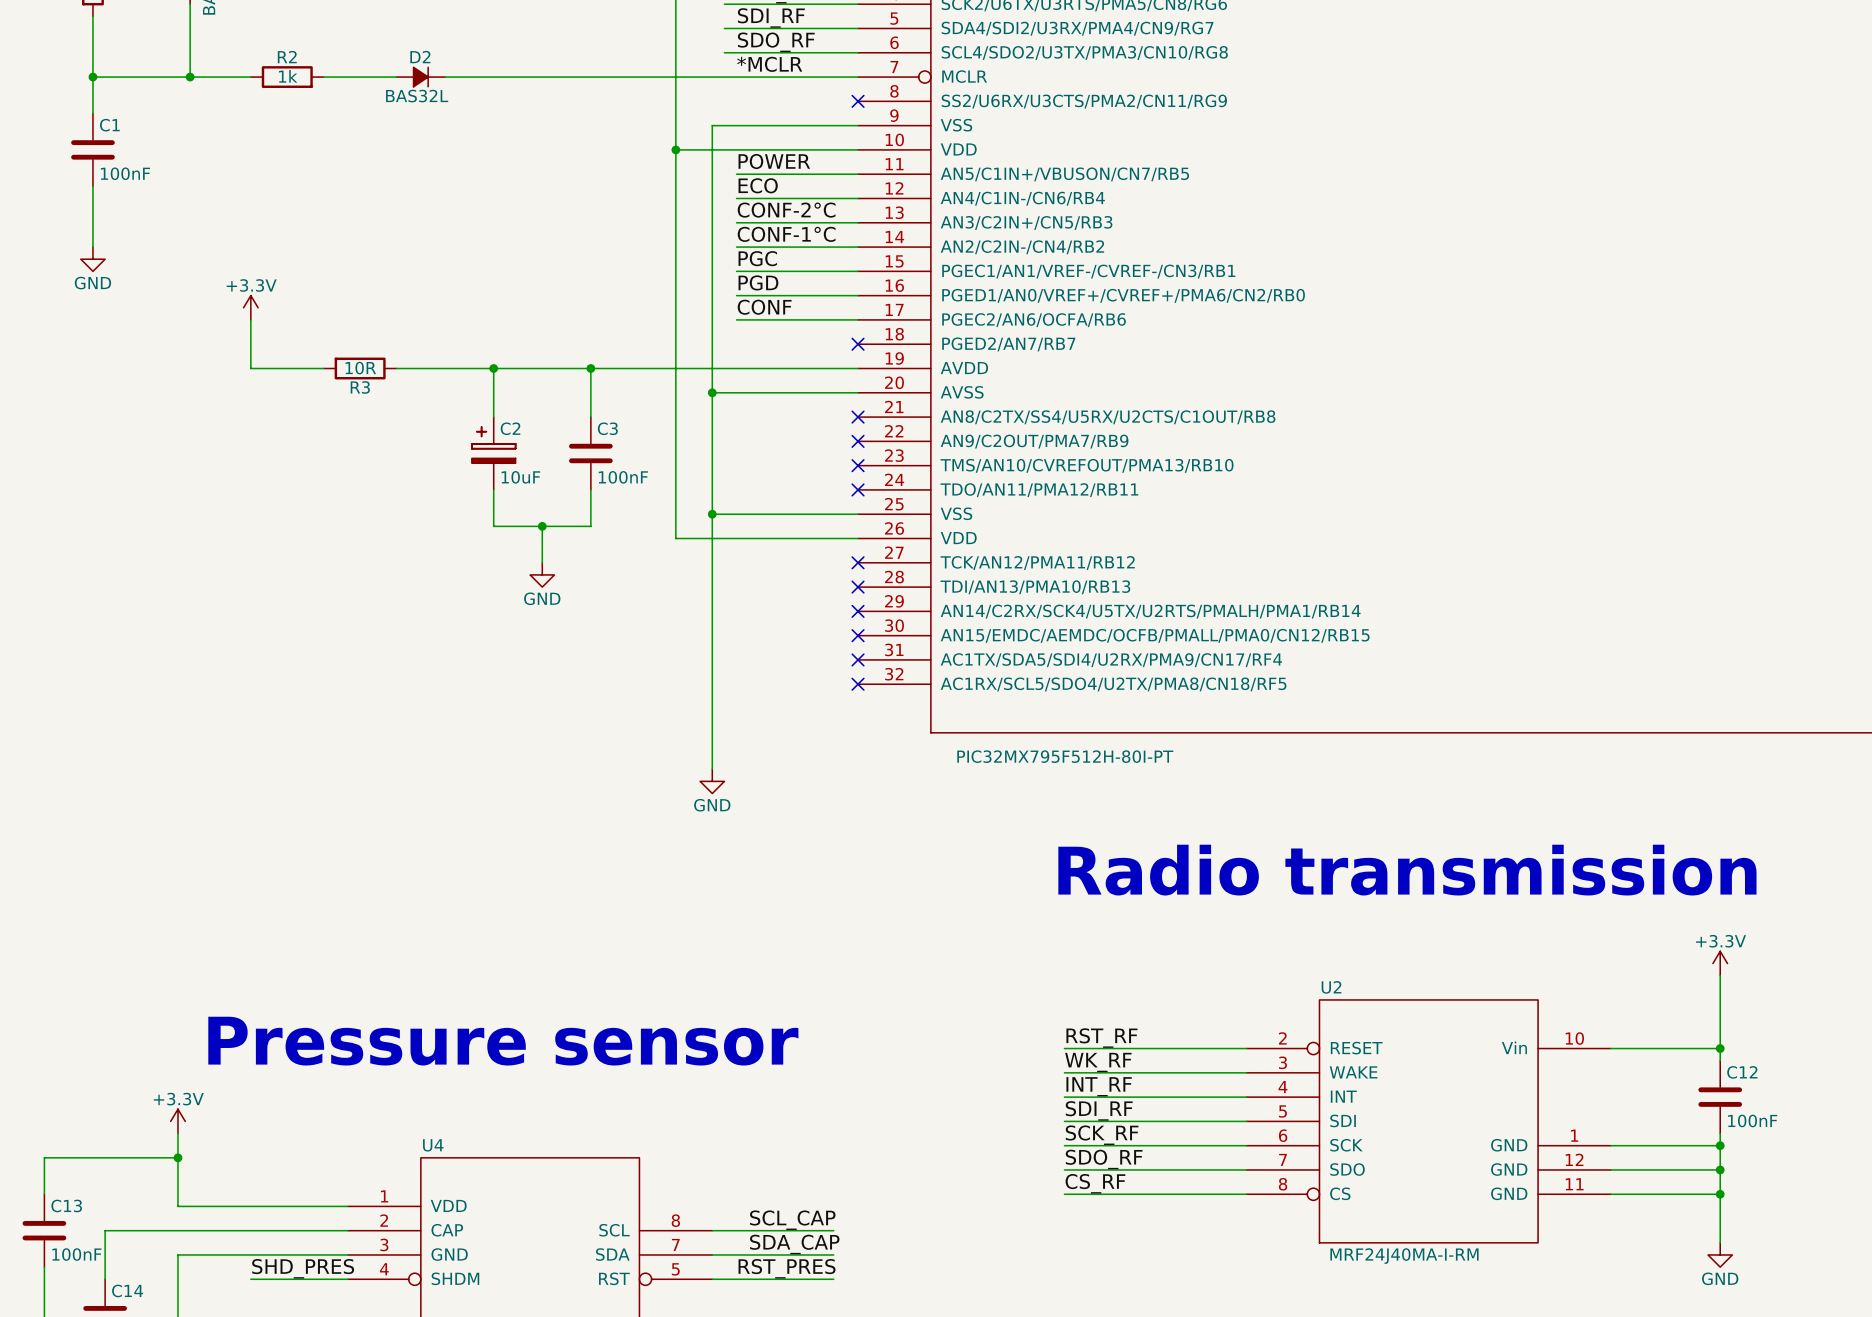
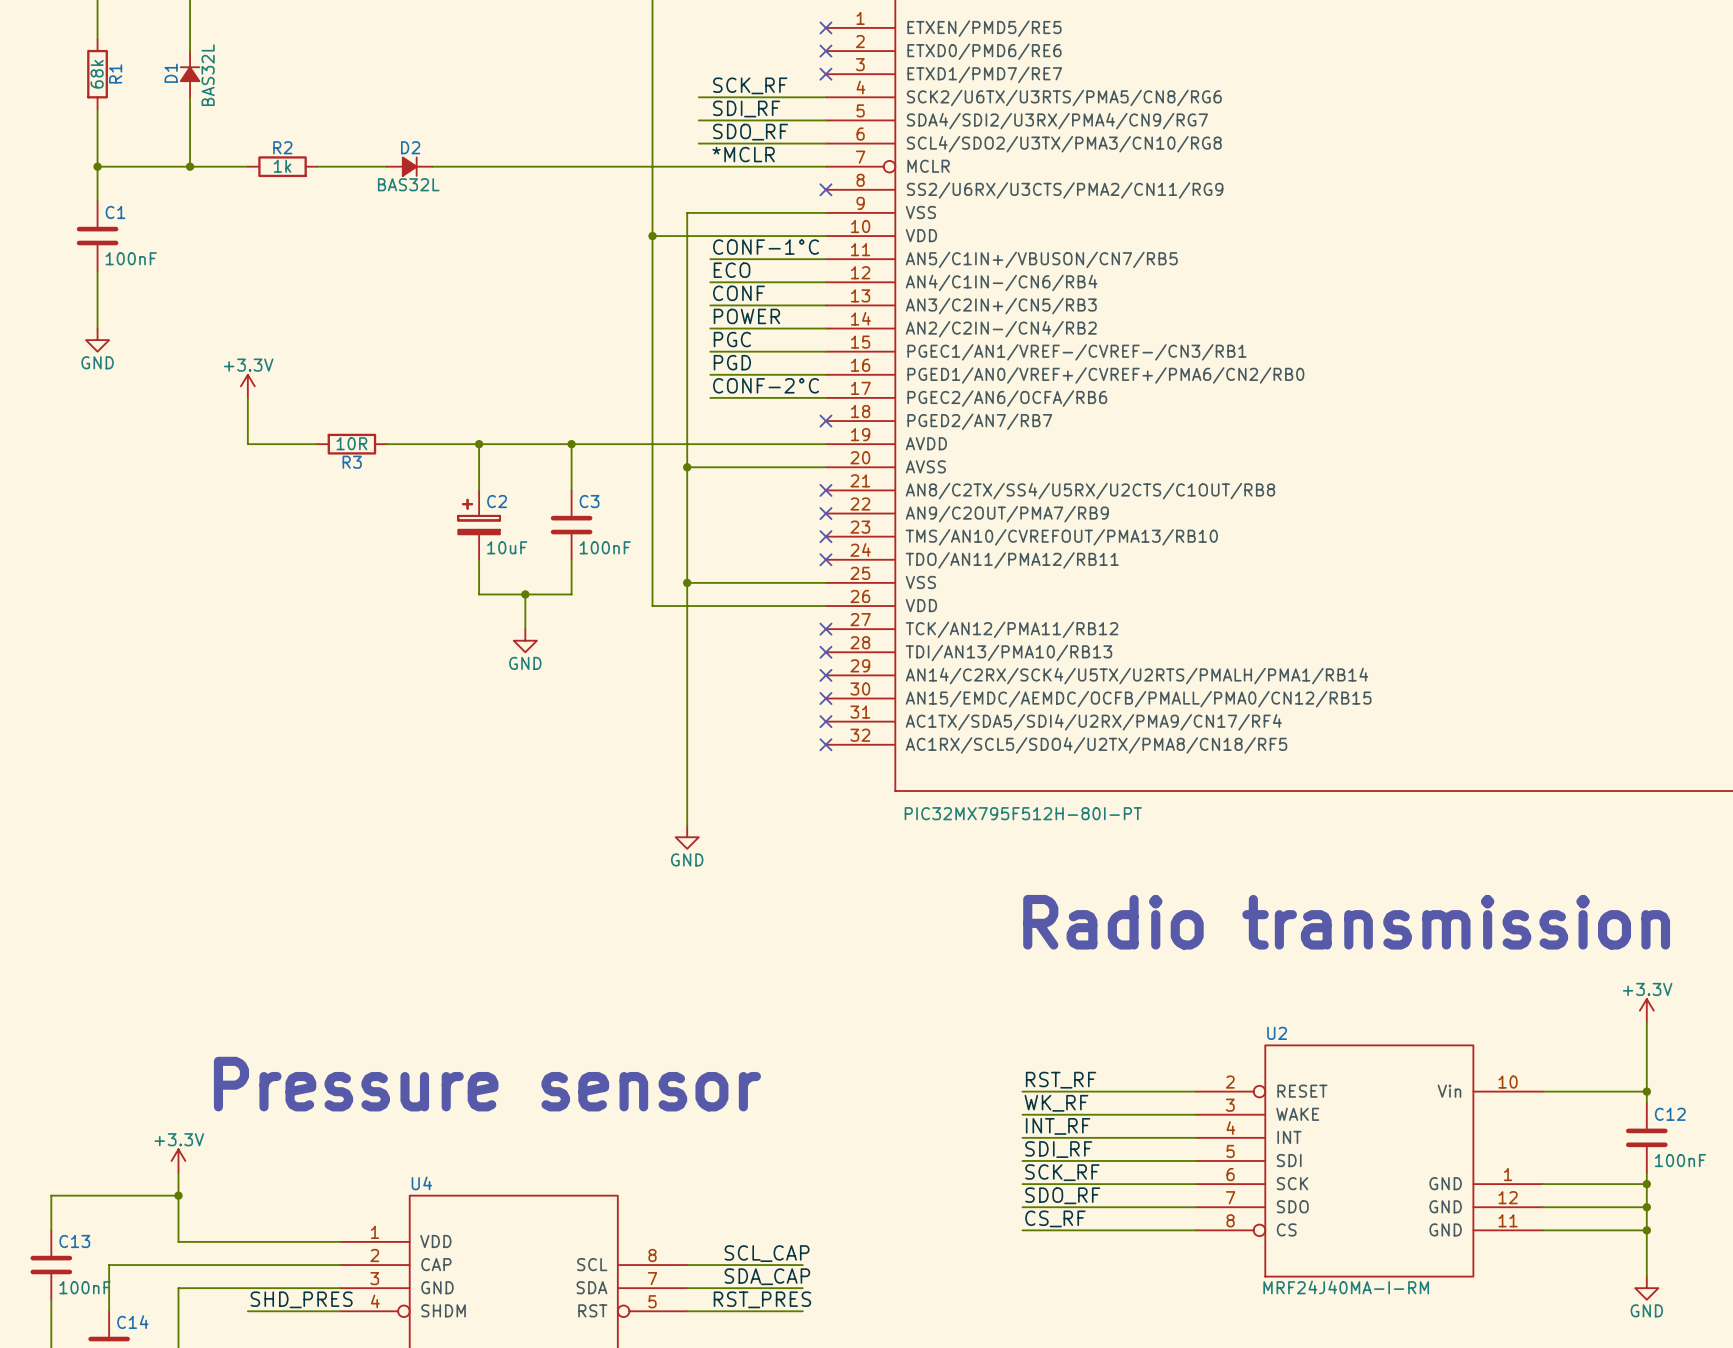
label: POWER (774, 161) -> CONF-1°C (766, 247)
label: CONF-2°C (786, 210) -> CONF (738, 293)
label: CONF-1°C (786, 234) -> POWER (746, 316)
label: CONF (764, 307) -> CONF-2°C (766, 385)

